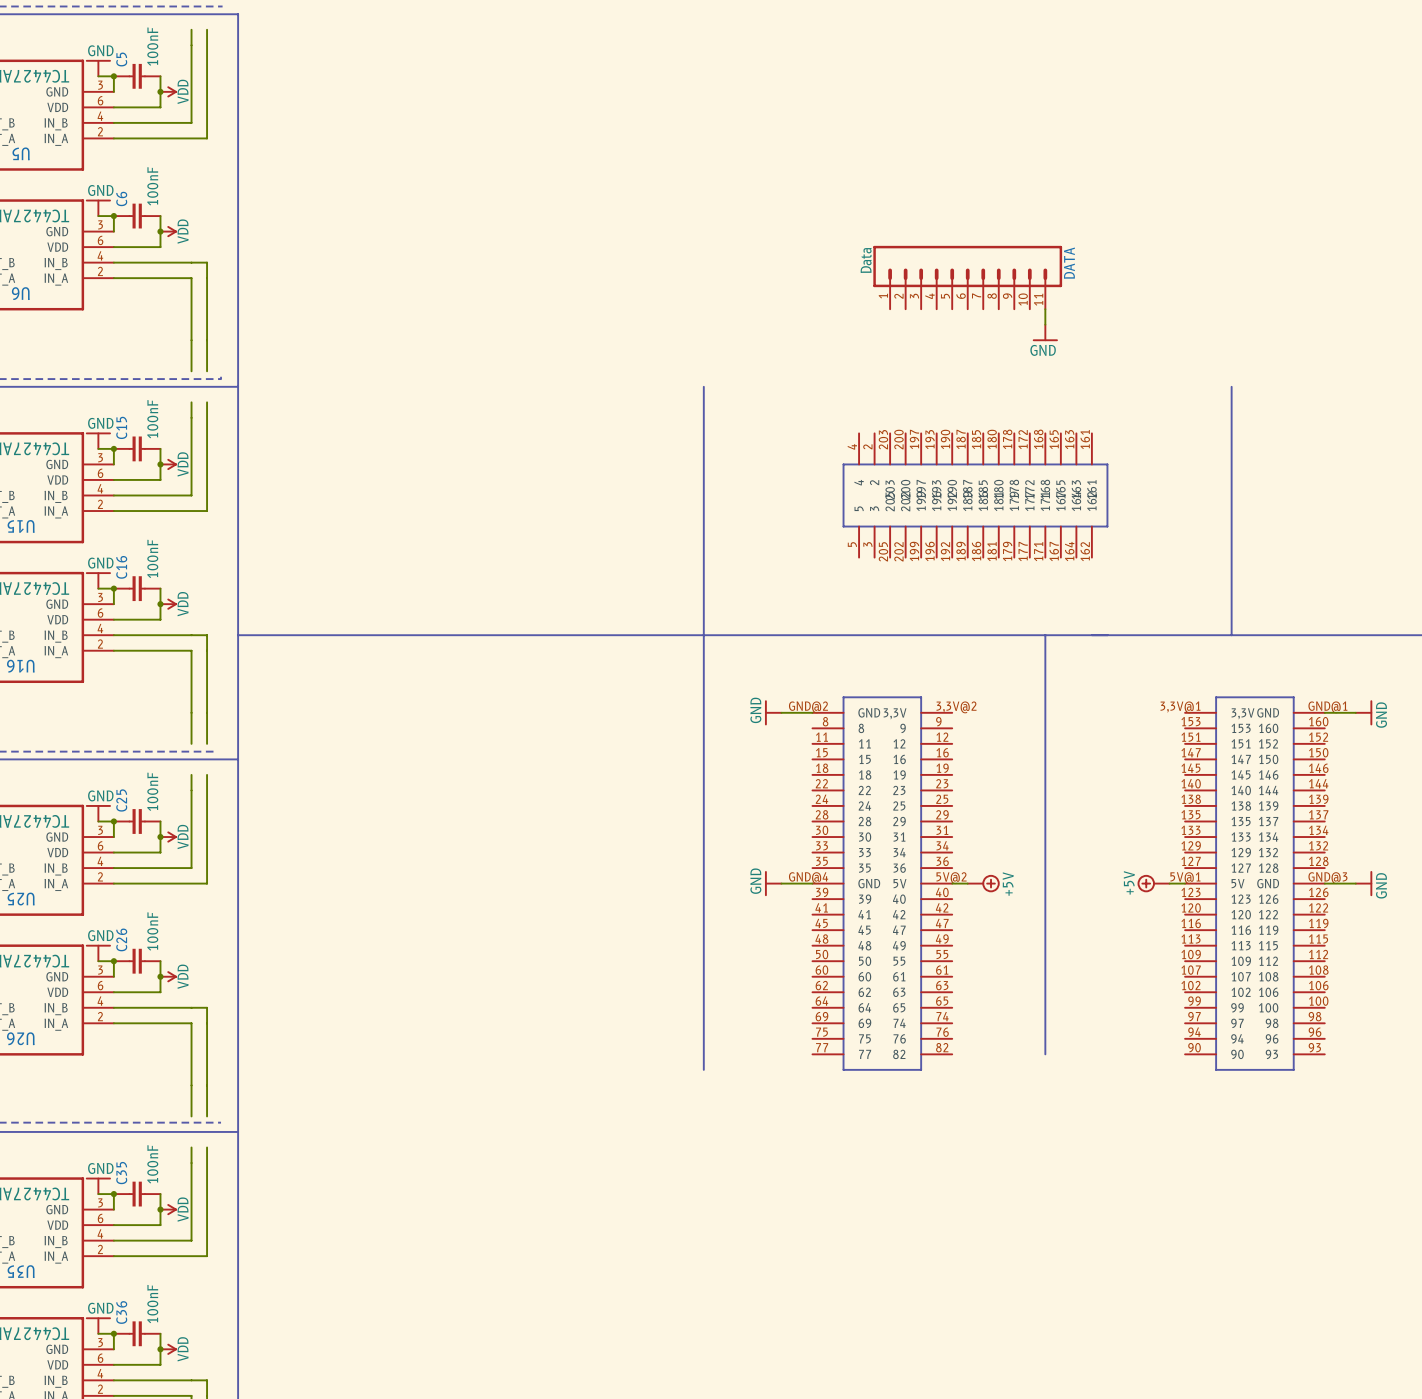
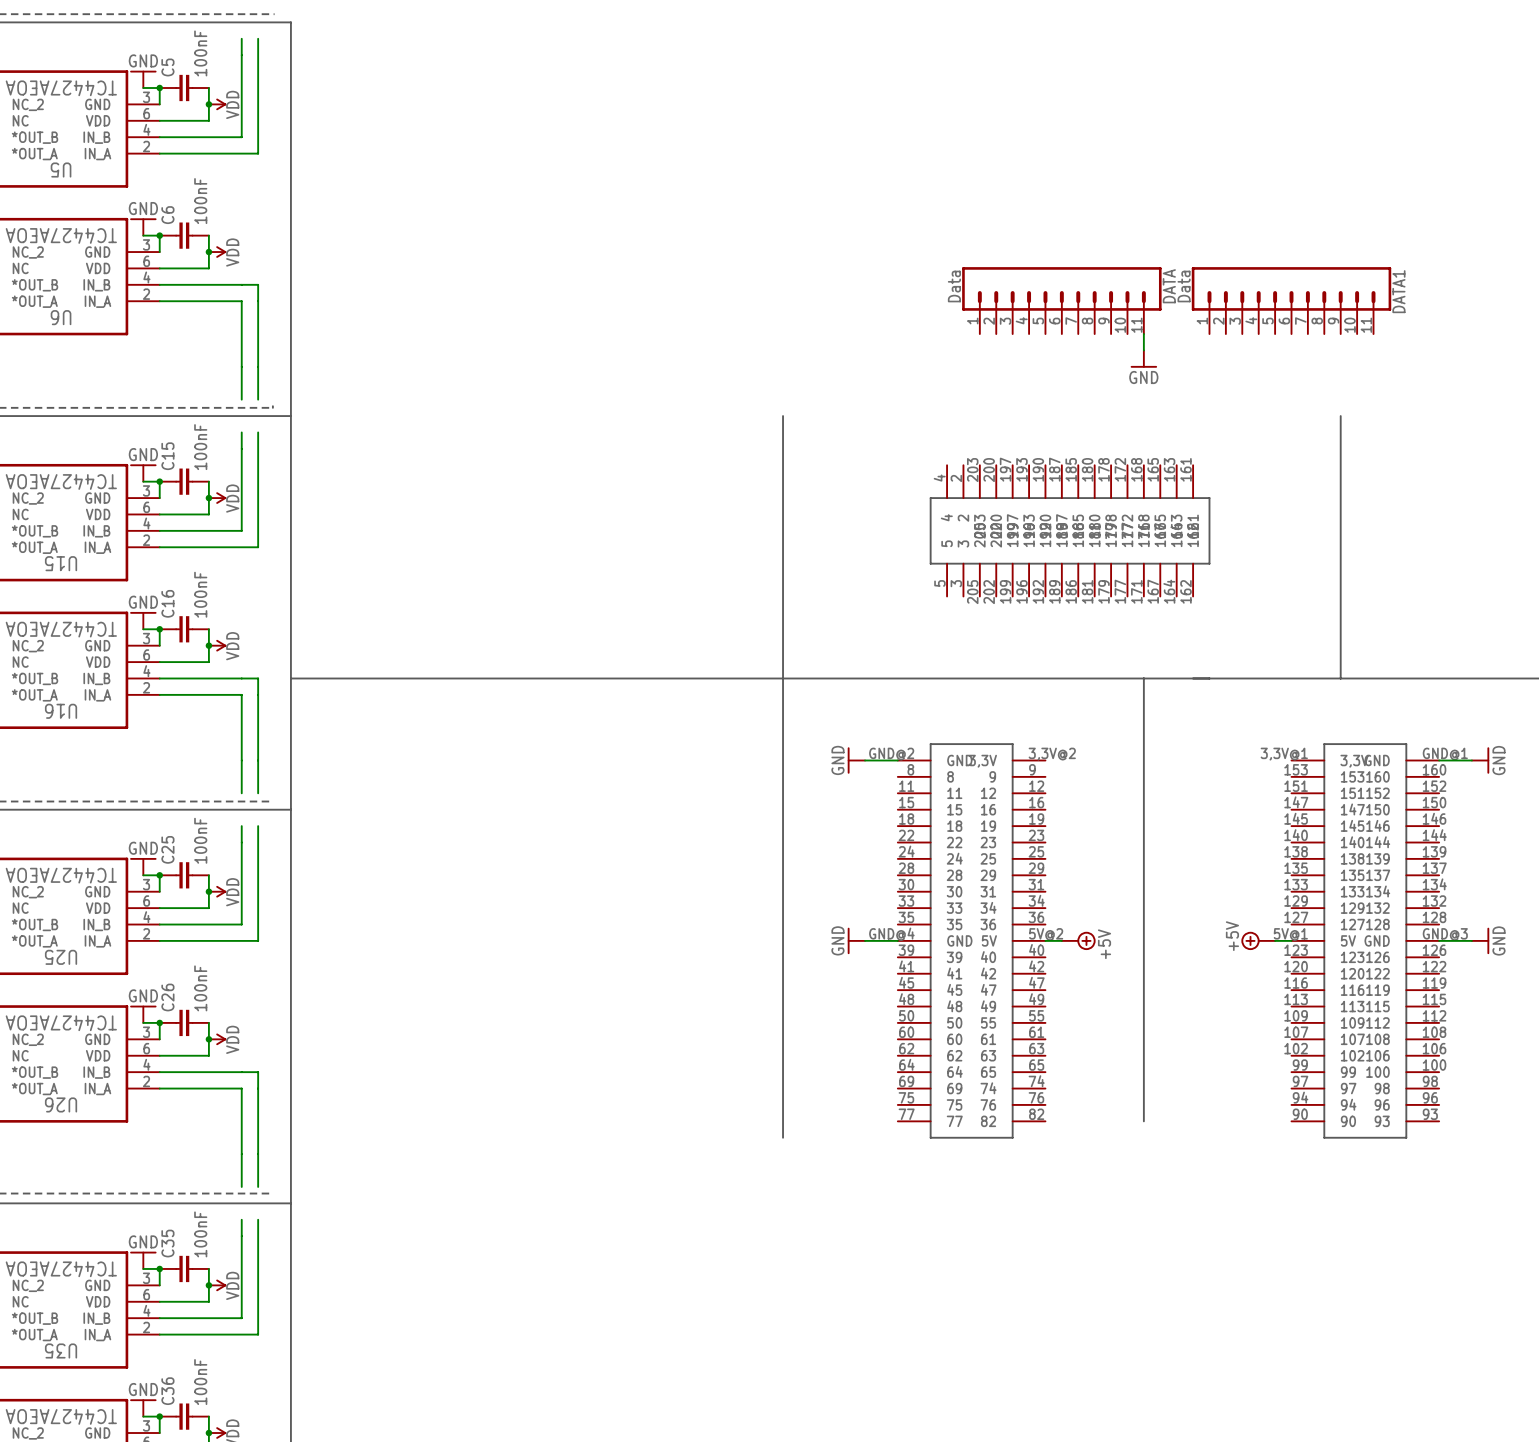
DATA1: none -> Data (1291, 300)

